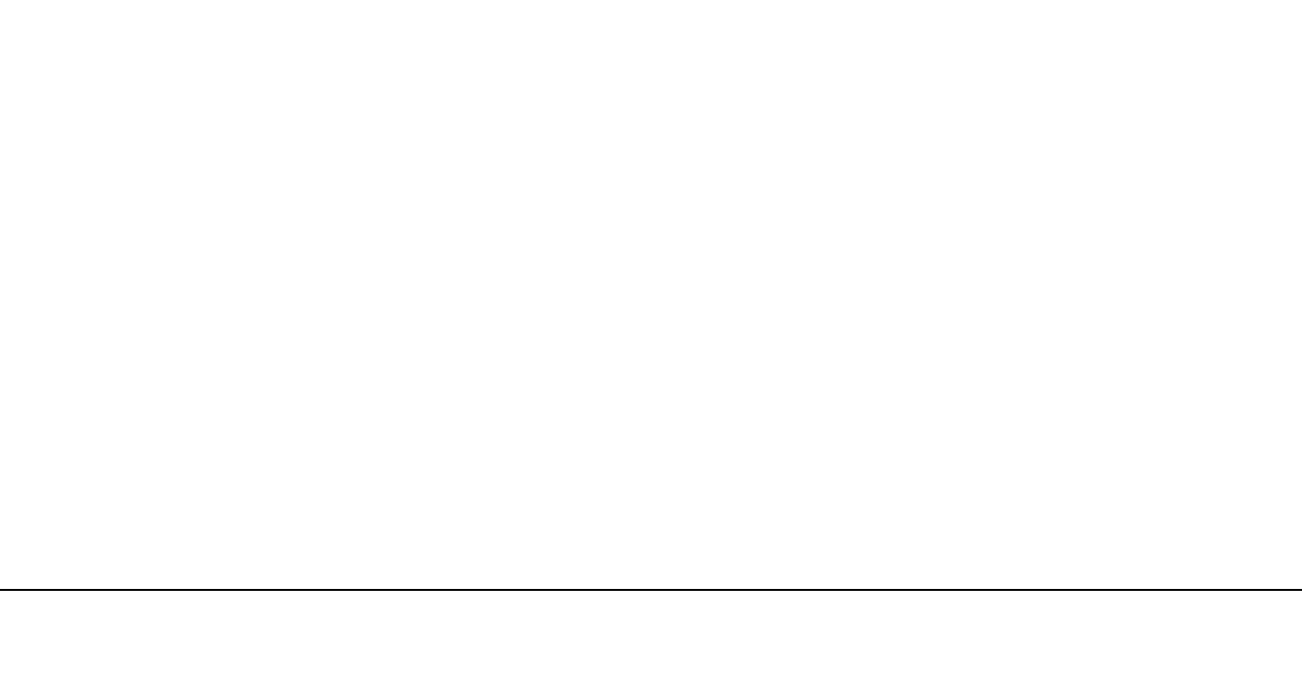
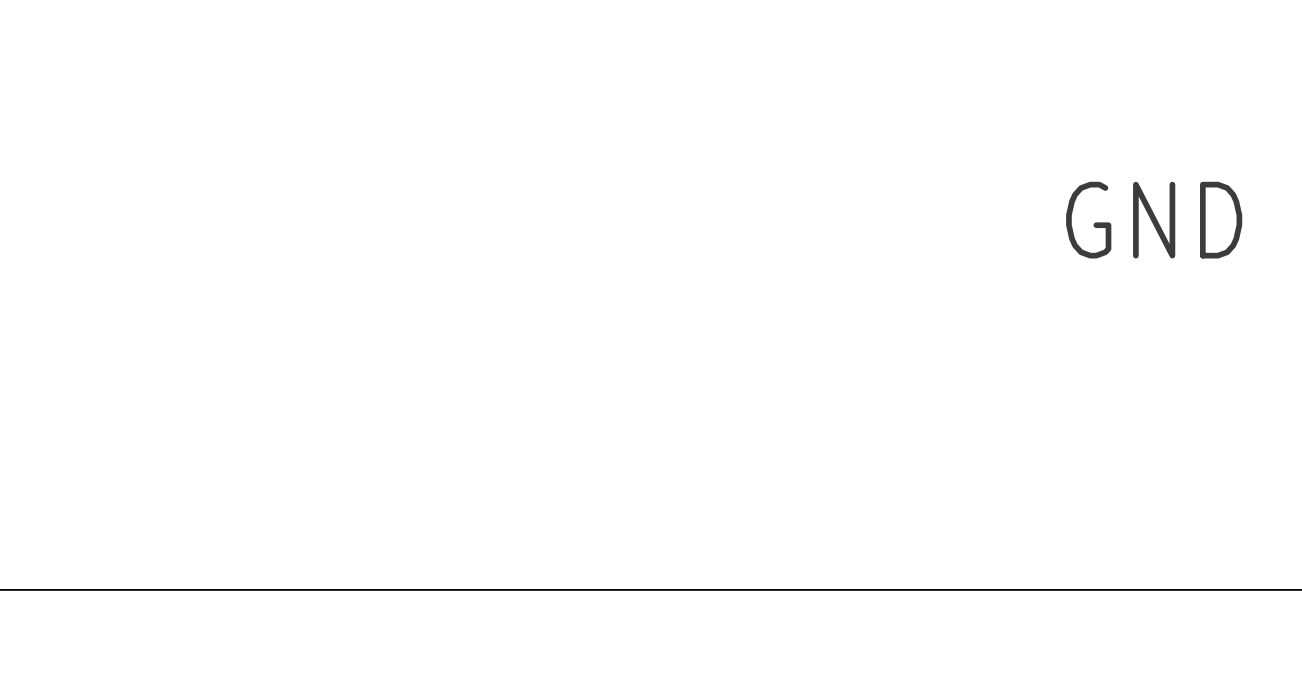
text: none -> GND (1154, 220)

